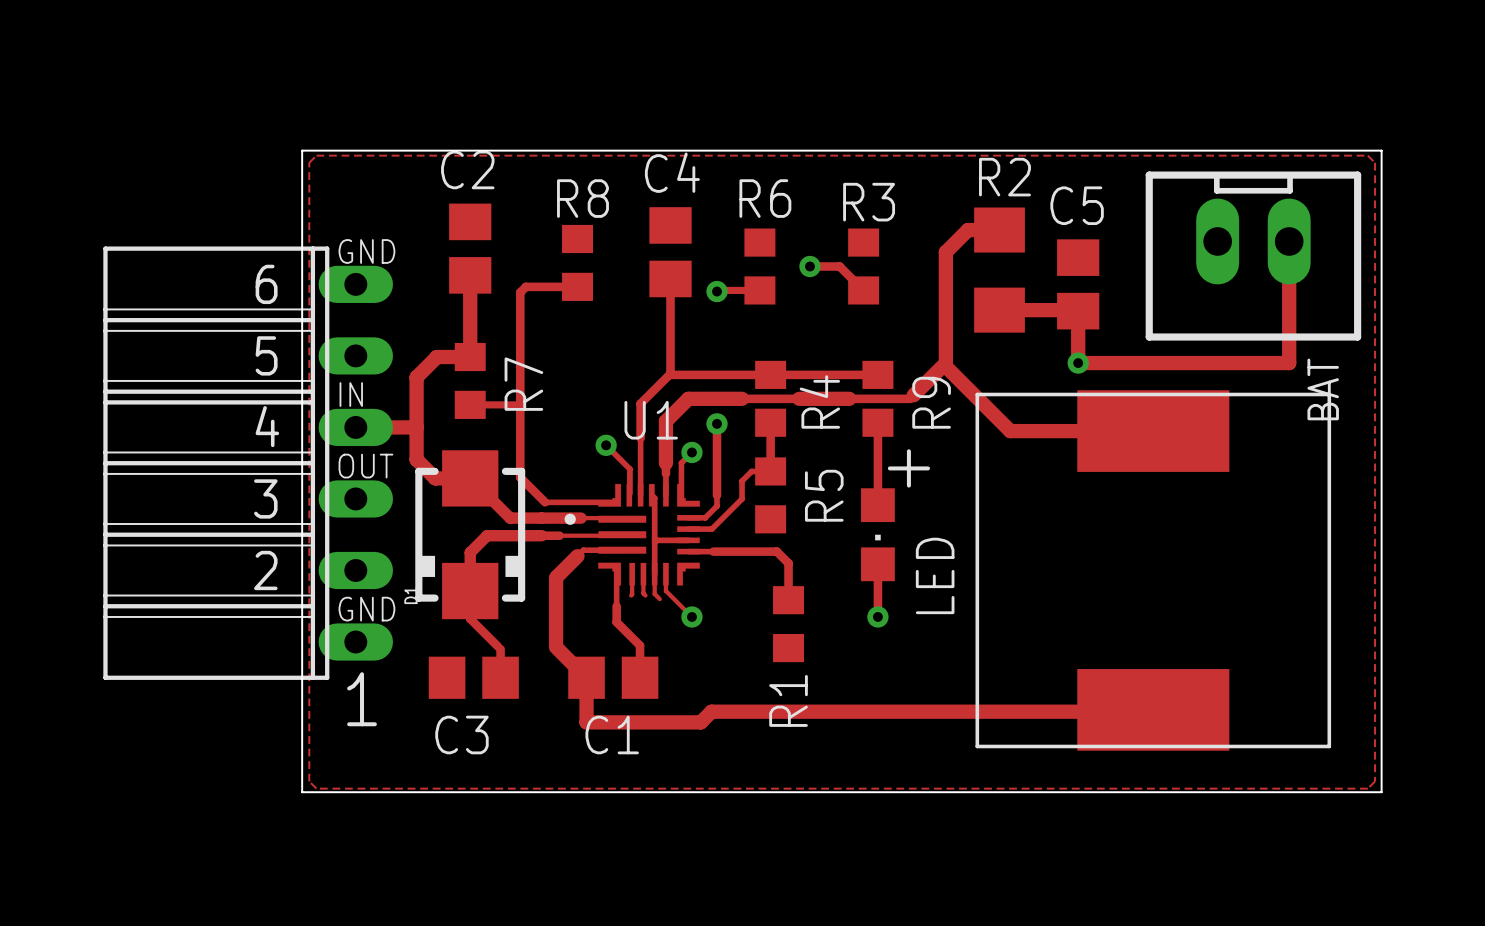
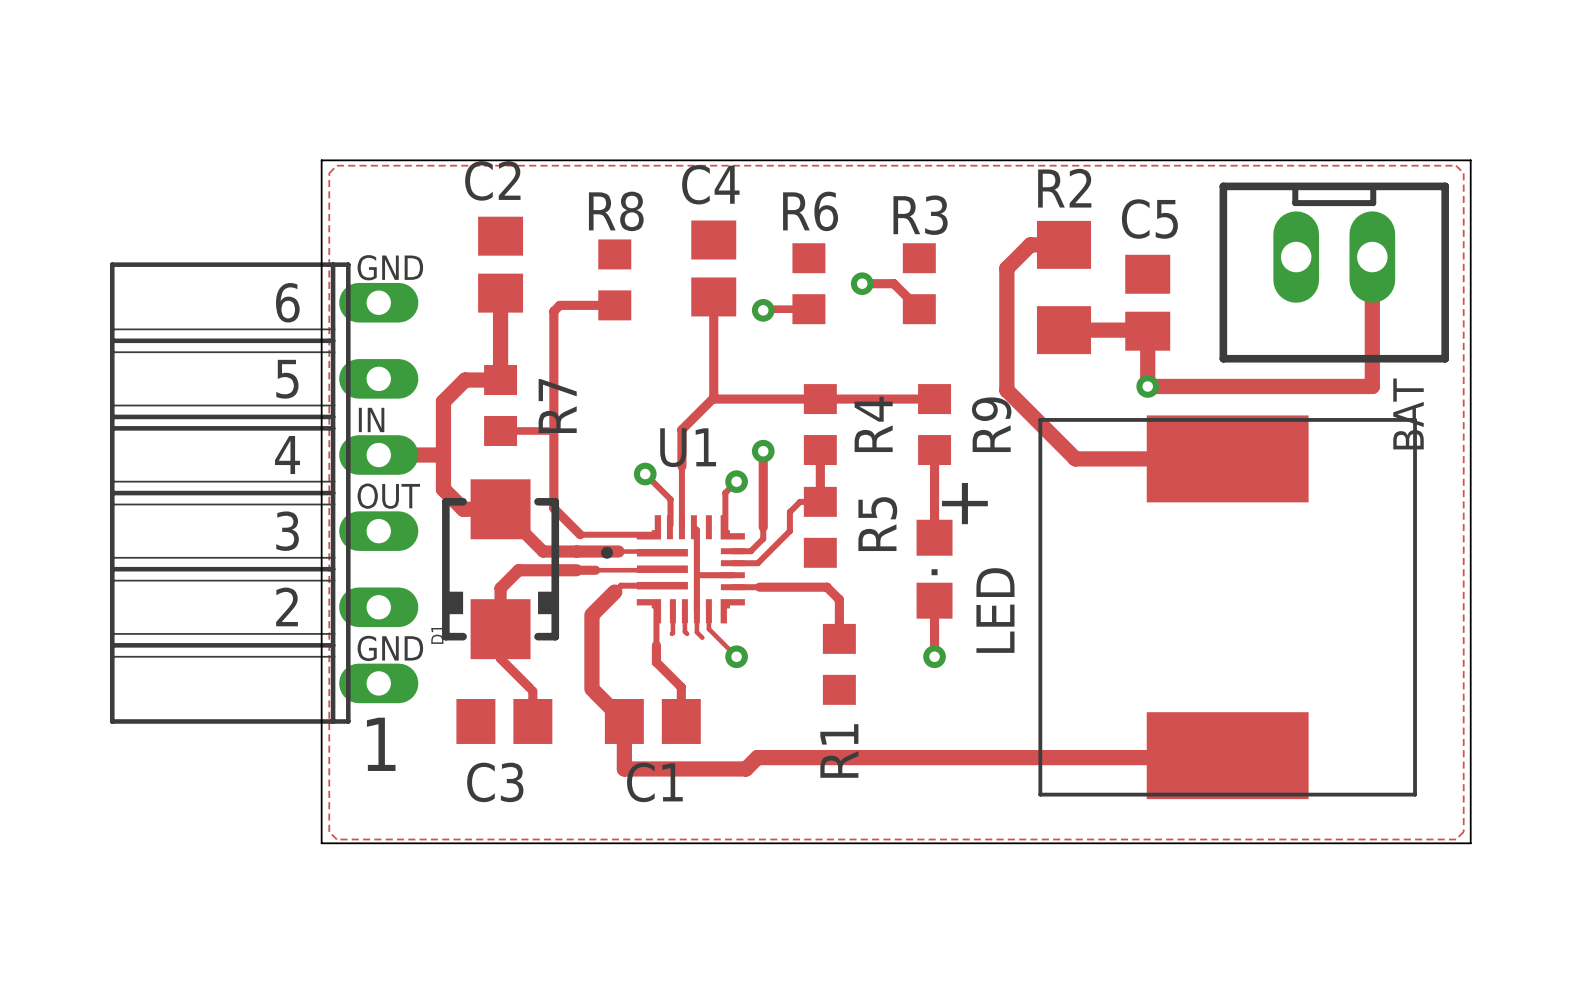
track: (945, 366) (942, 366) (910, 398) (688, 398) (665, 421) (665, 495) -> none

